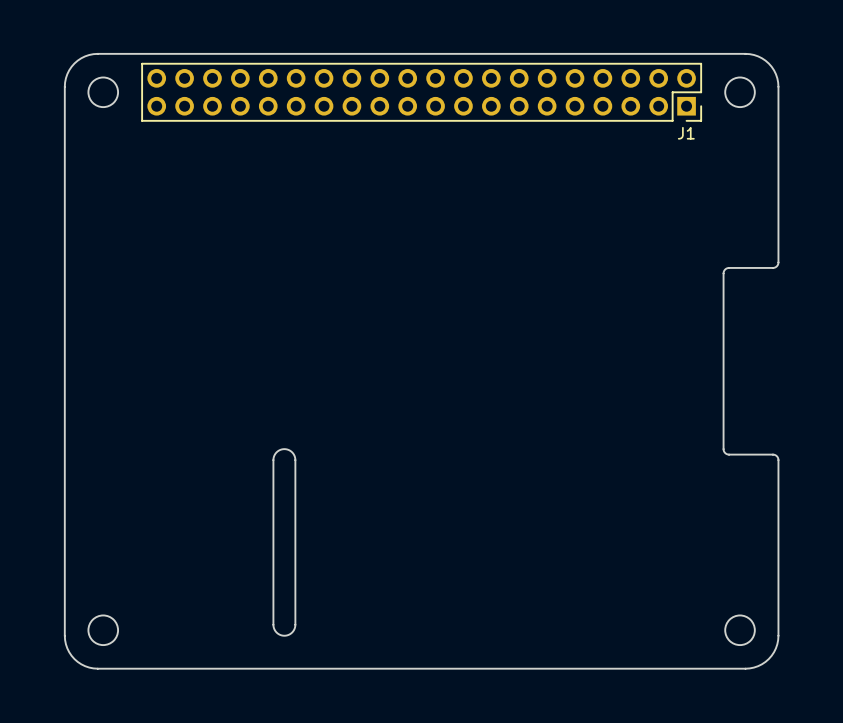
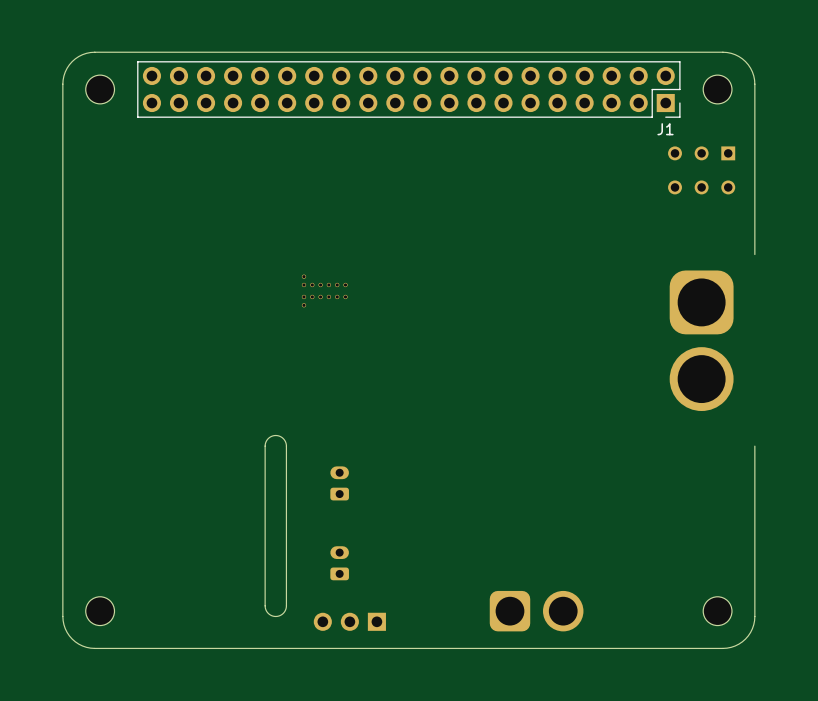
part: none -> (701, 170)
board edge: (778, 262) (773, 267) (727, 268) (723, 273) (723, 450) (728, 454) (773, 454) (778, 460) -> none
part: none -> (324, 290)
part: none -> (701, 340)
part: none -> (339, 483)
part: none -> (339, 563)
part: none -> (536, 611)
part: none -> (349, 621)

